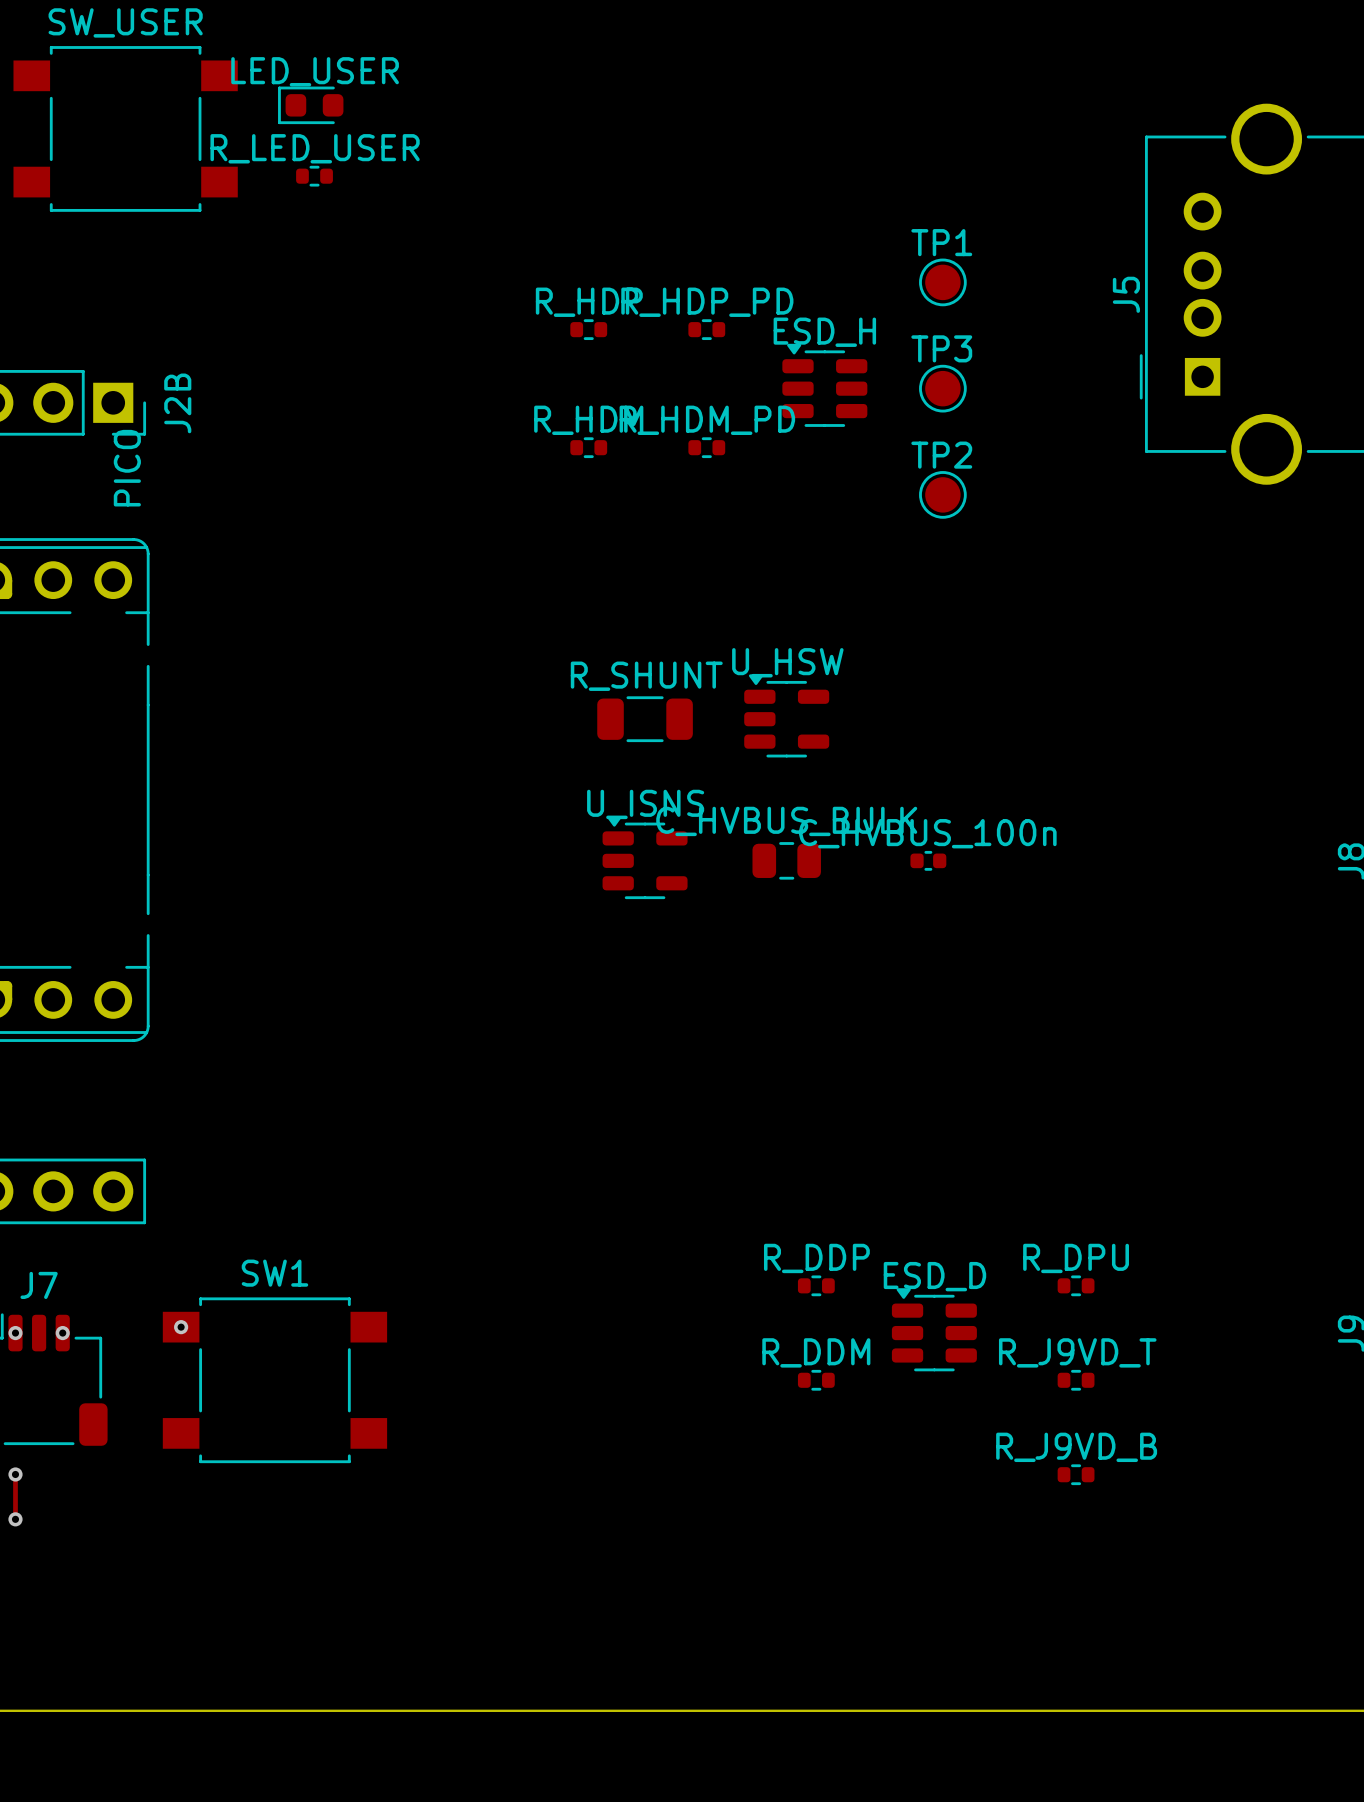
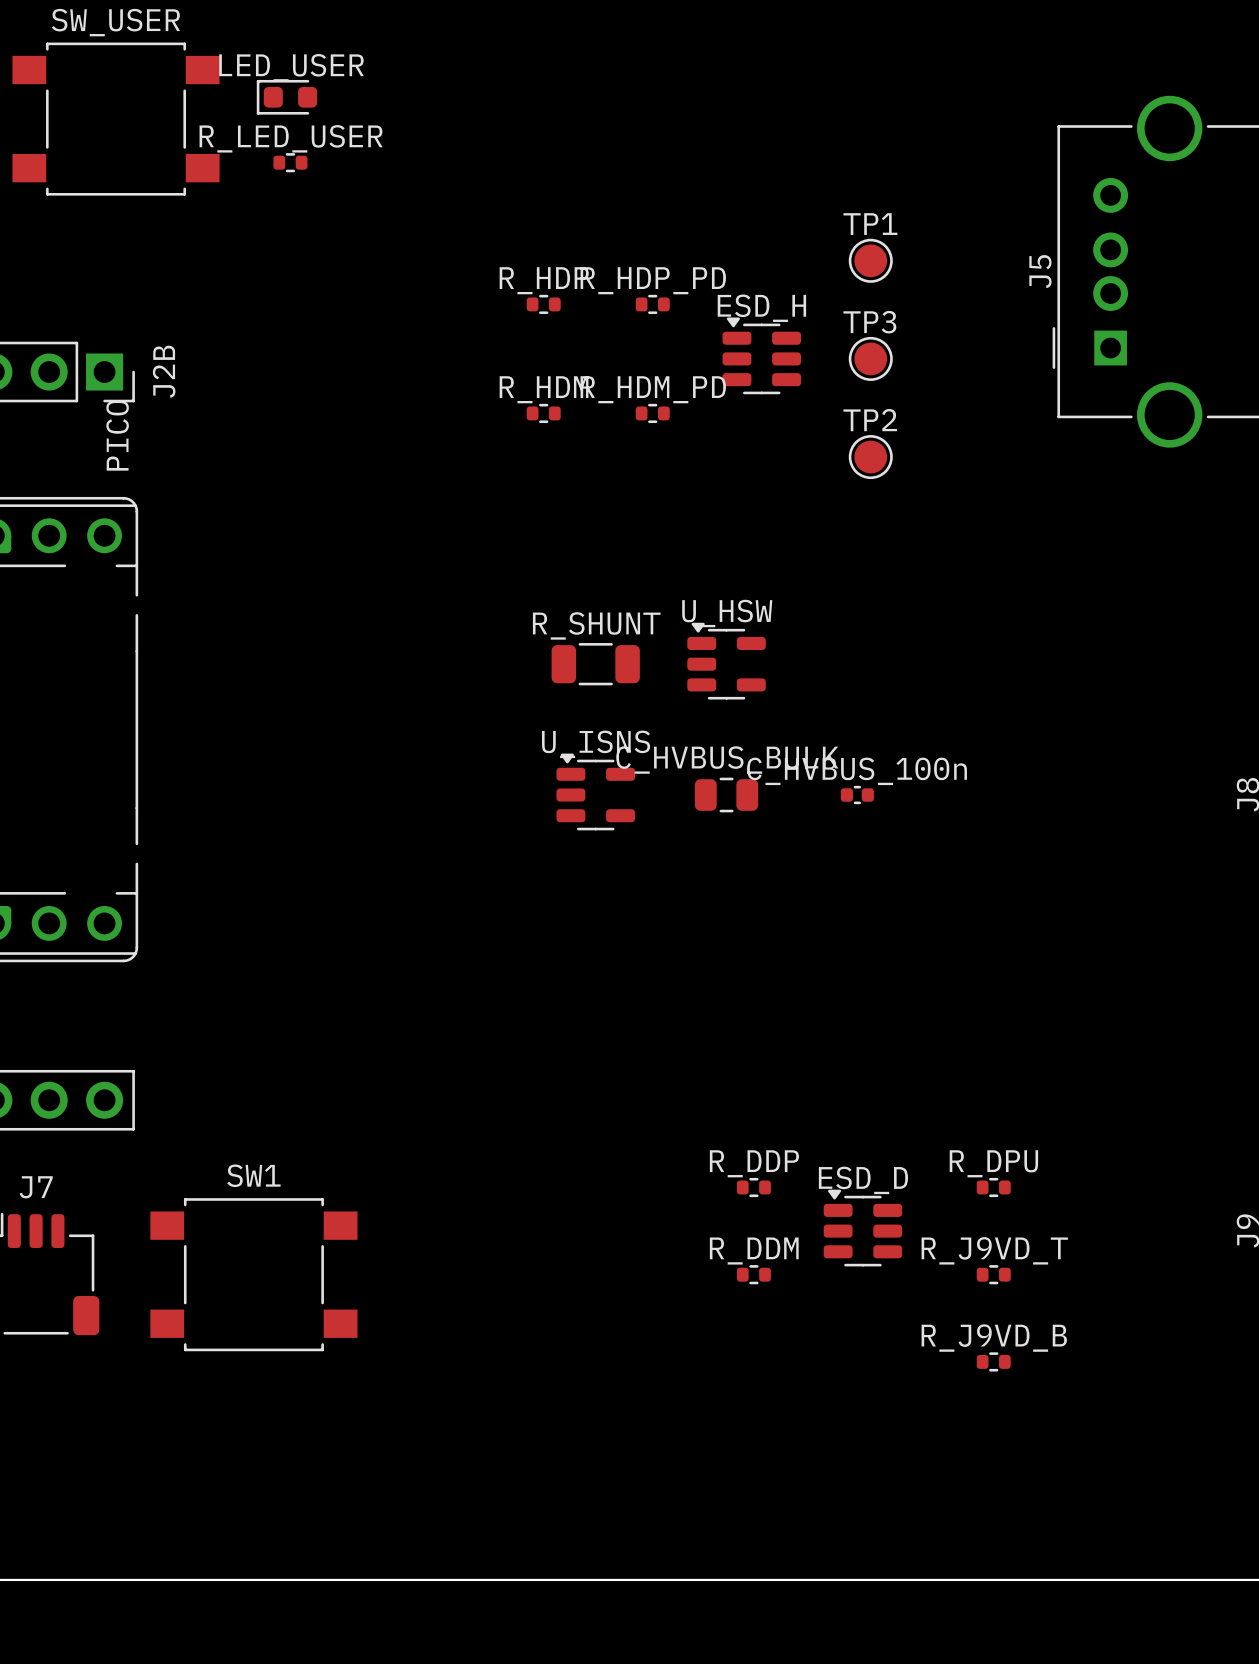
via: (181, 1327) -> none
via: (15, 1333) -> none
via: (62, 1333) -> none
track: (15, 1474) (15, 1519) -> none
via: (15, 1474) -> none
via: (15, 1519) -> none

